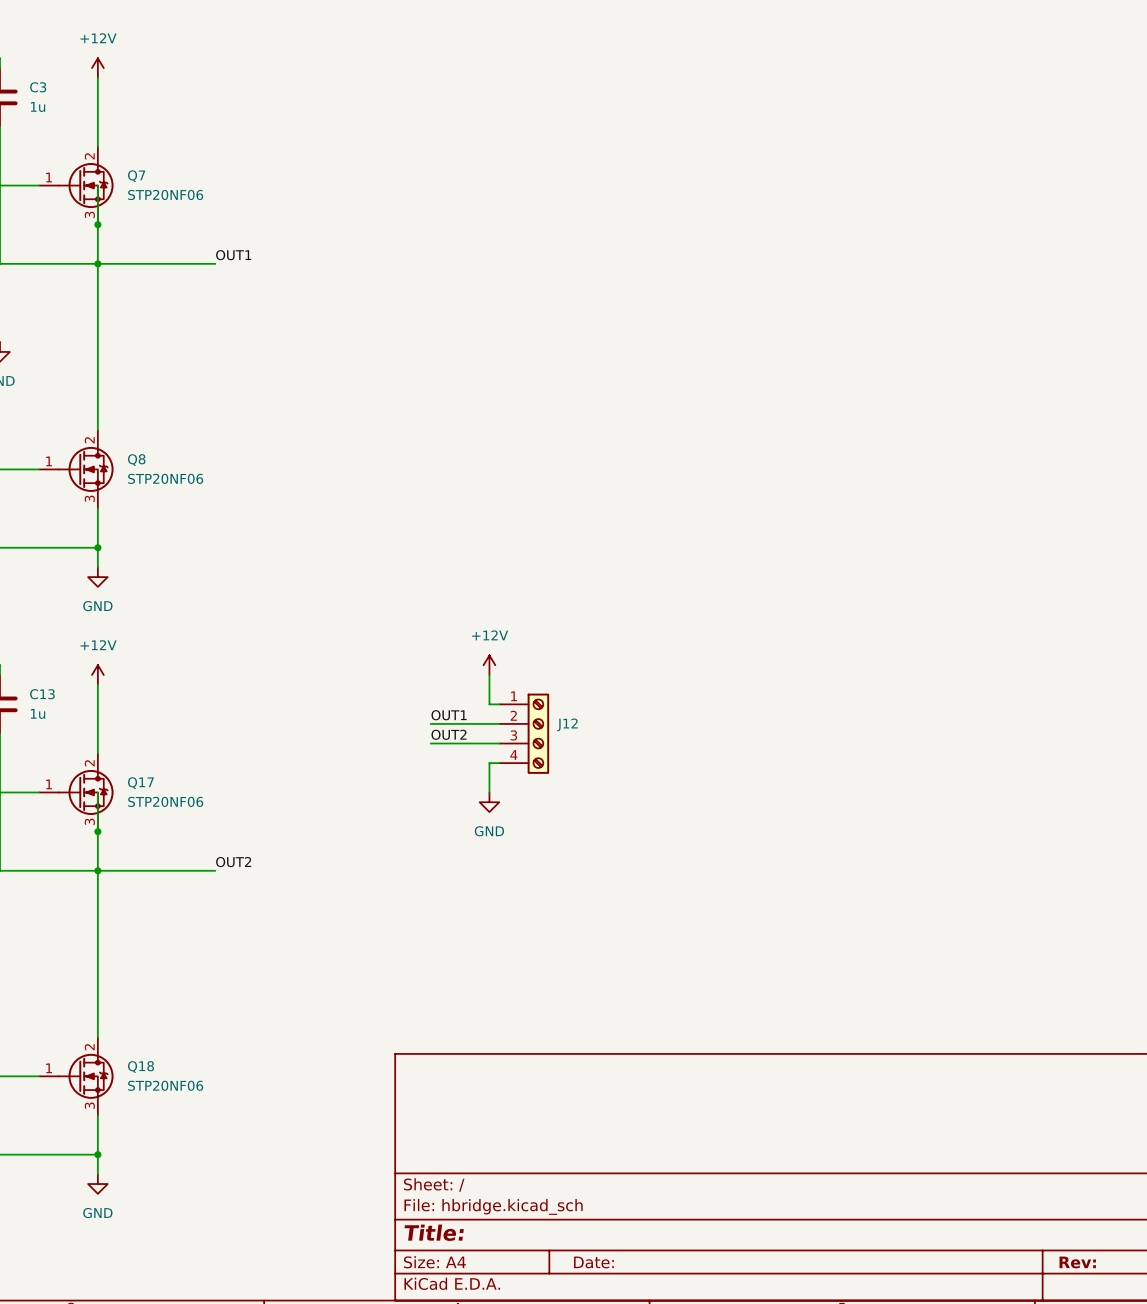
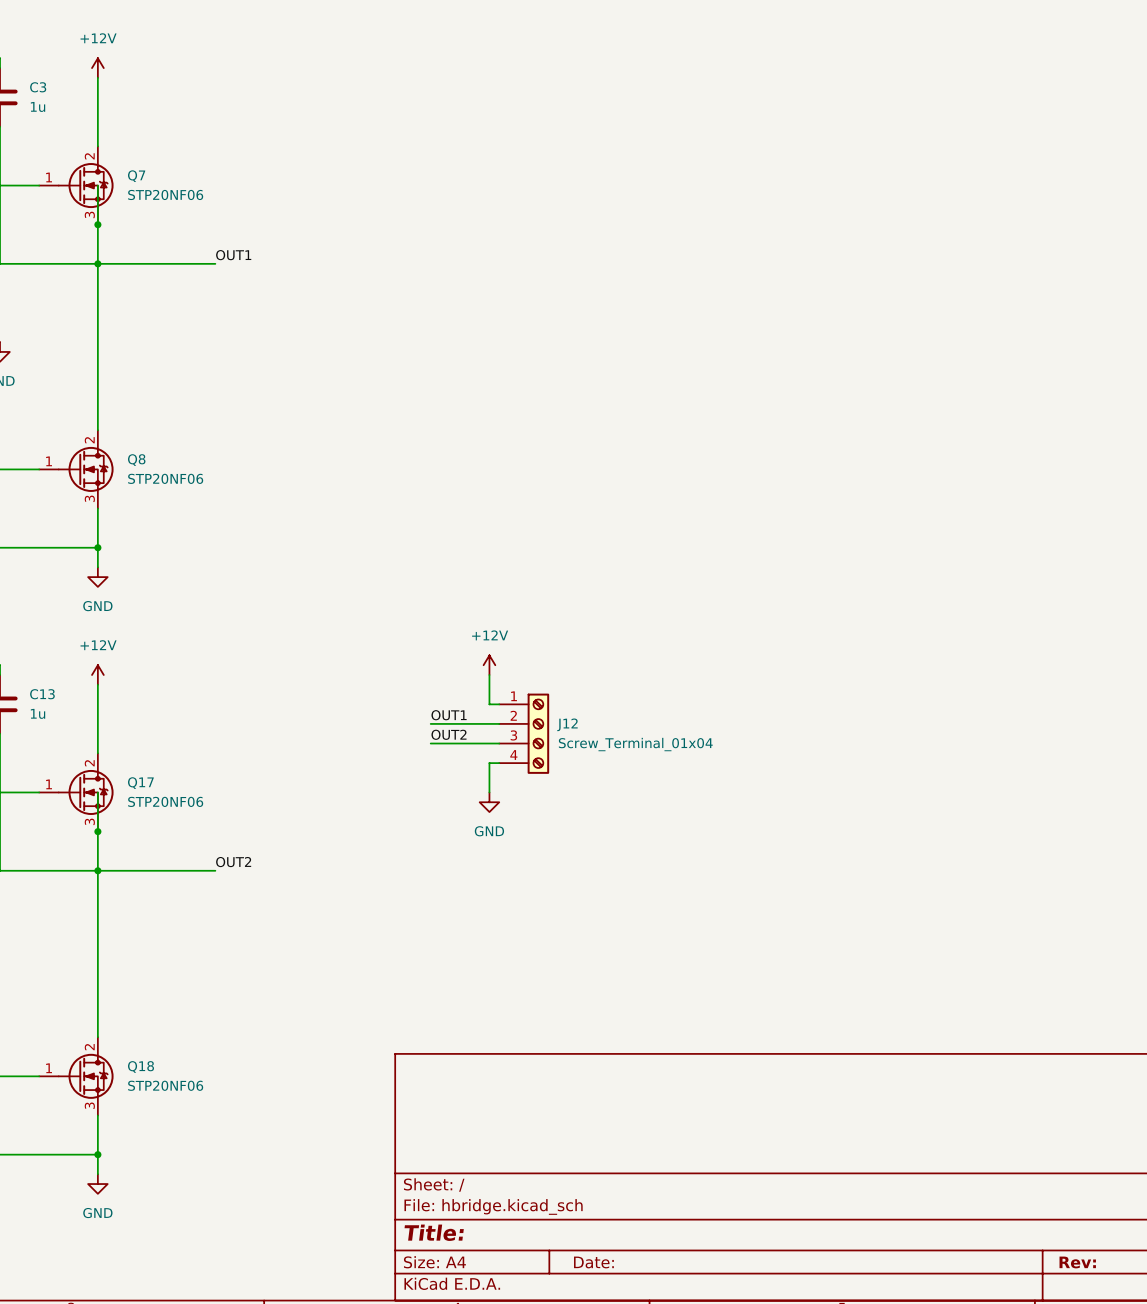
J12 value: none -> Screw_Terminal_01x04 (635, 744)

